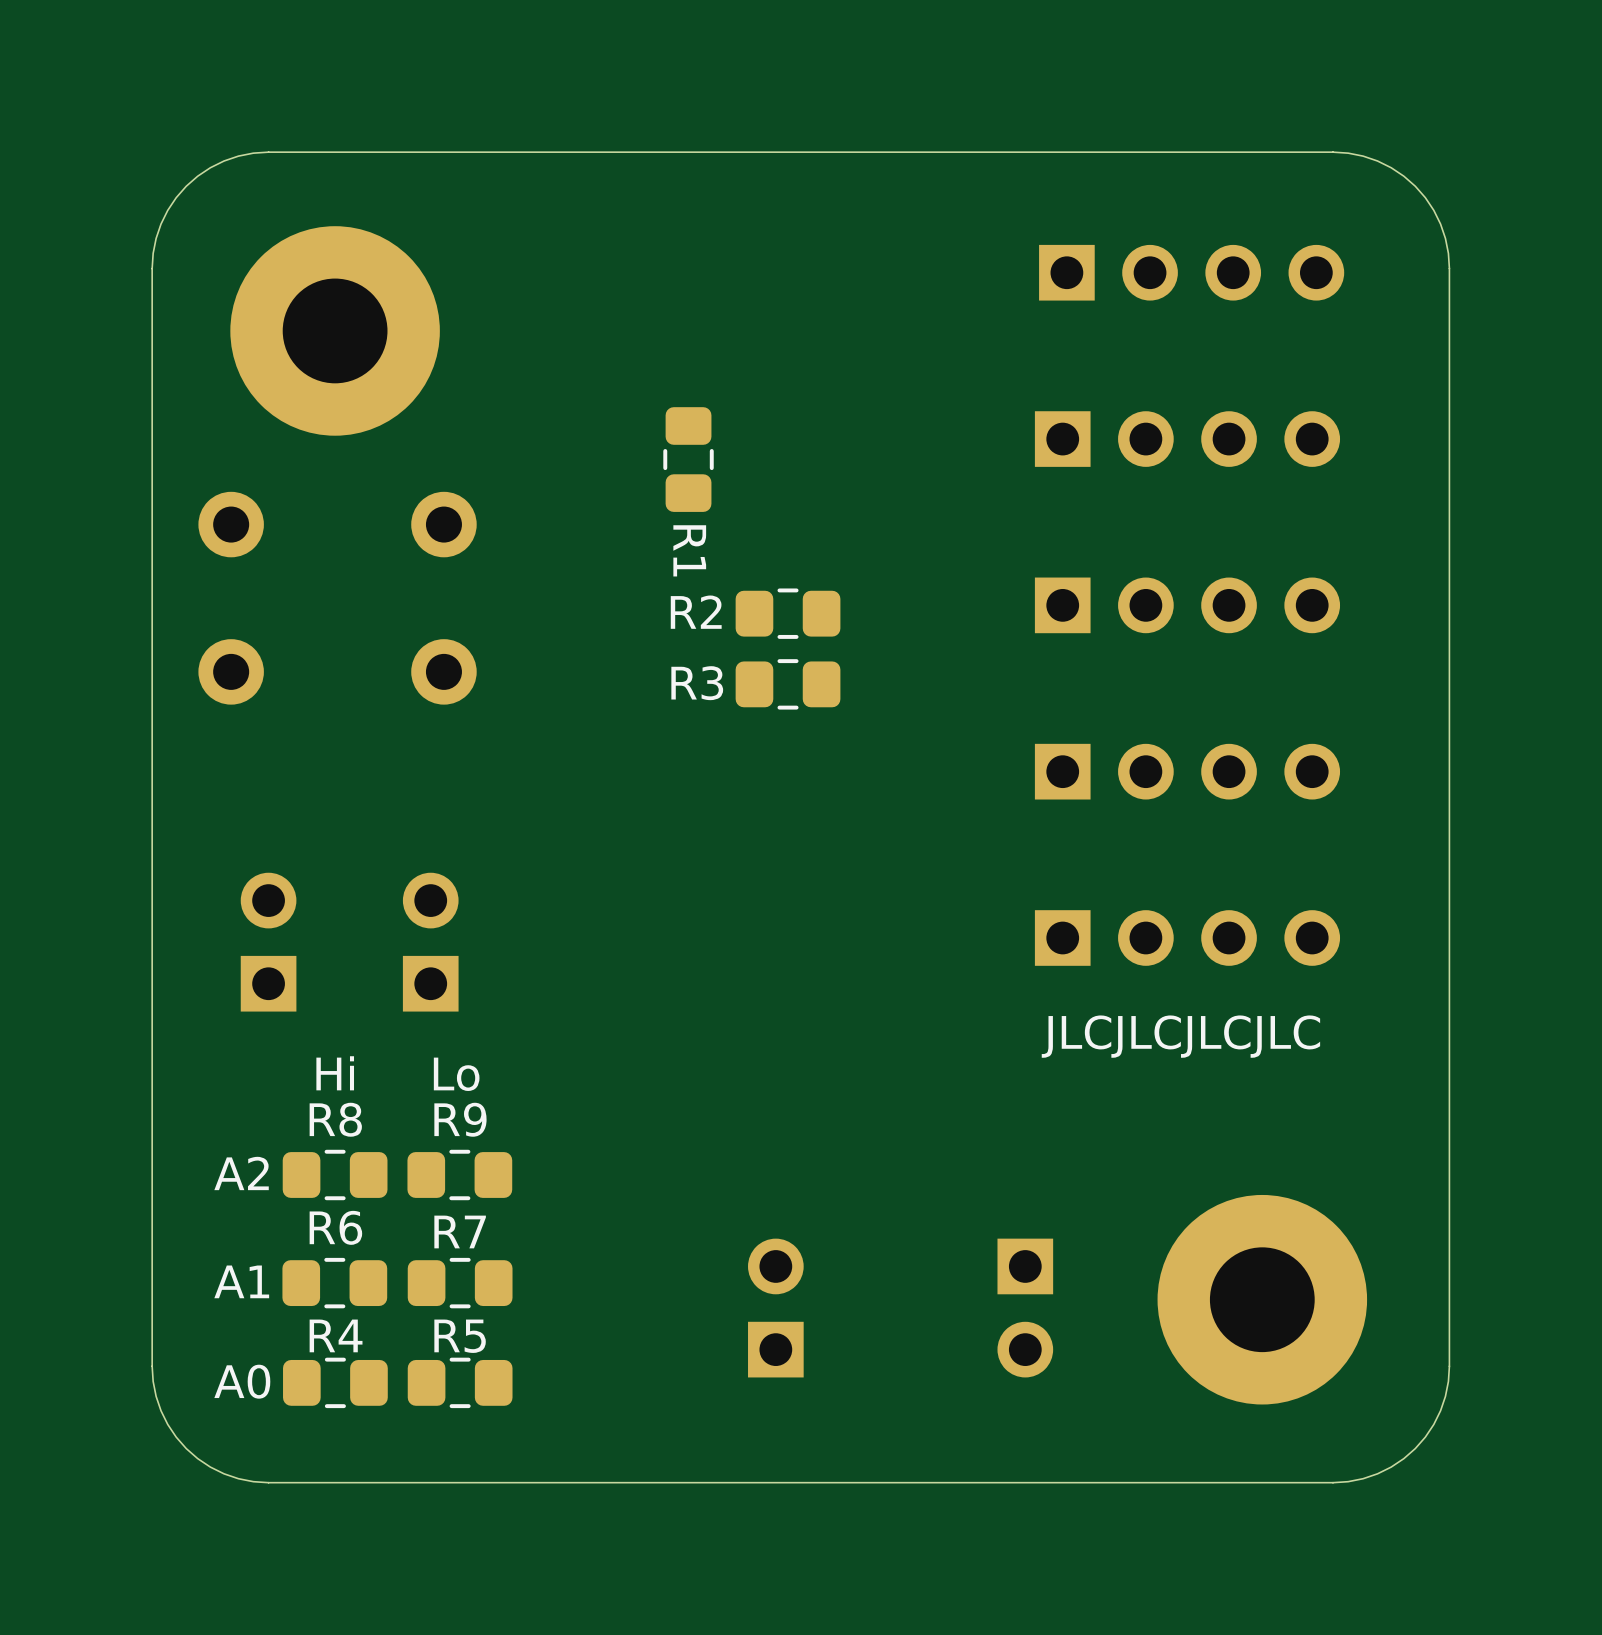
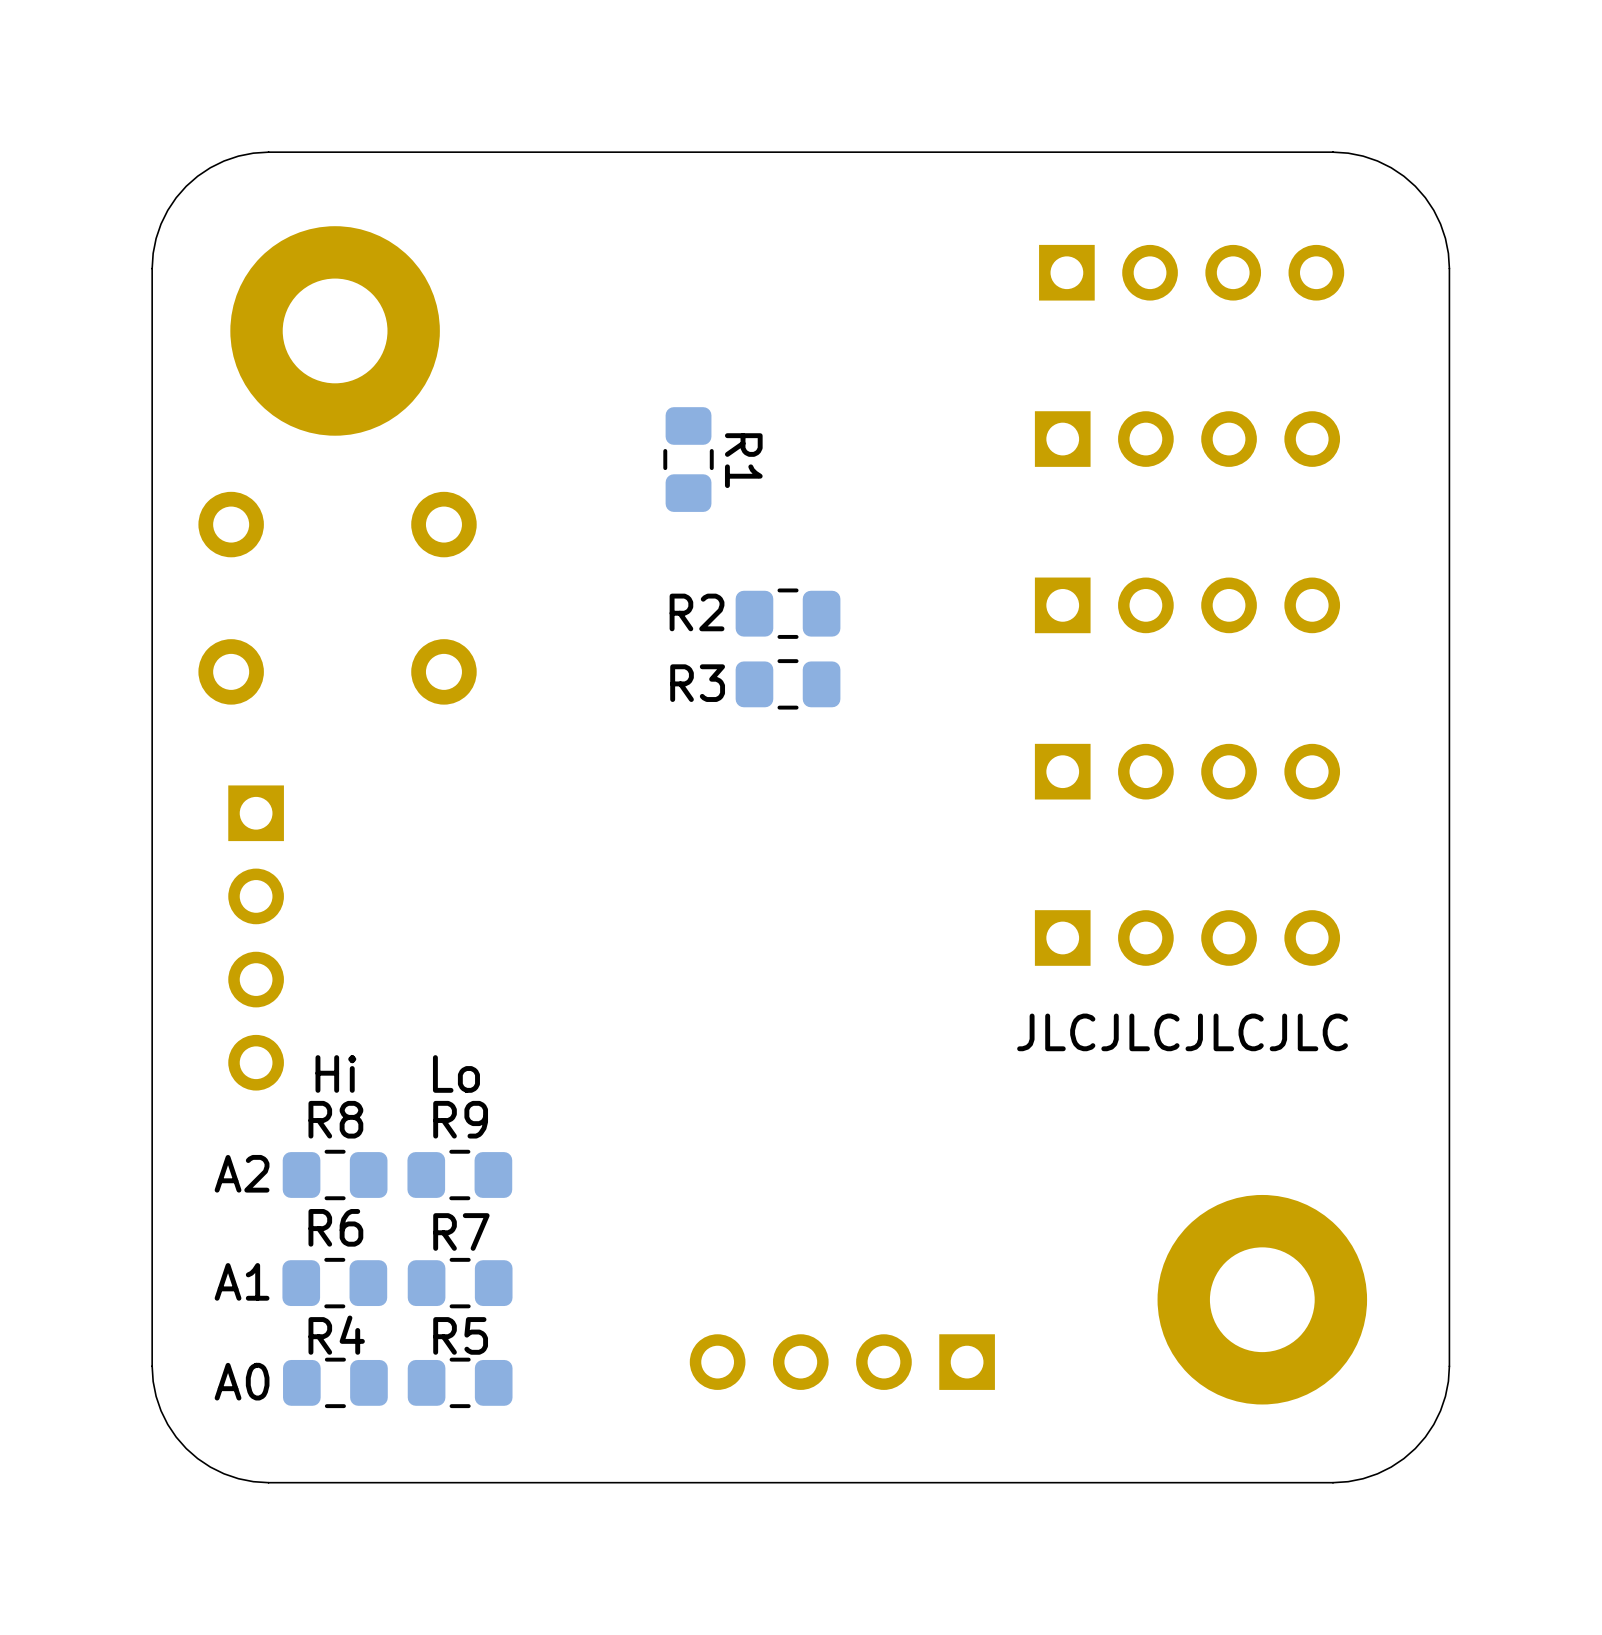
R1 name position: R1 (689, 550) -> R1 (743, 460)
part footprint: [240, 872, 297, 1012] -> [228, 785, 284, 1091]
part: (430, 942) -> none
part: (775, 1308) -> none
part: (1025, 1308) -> none
part: none -> (842, 1362)

